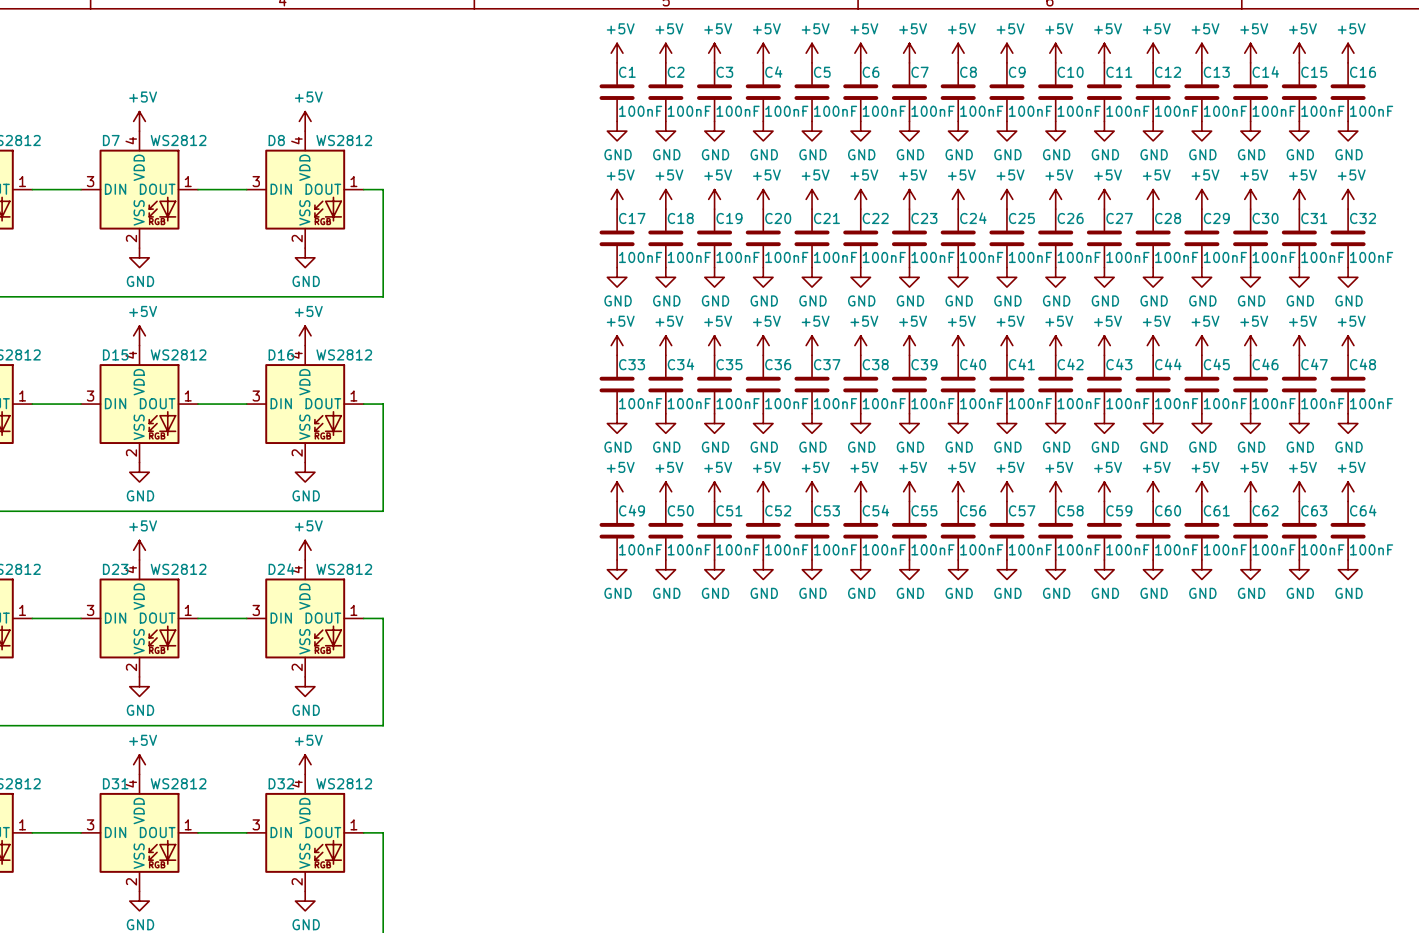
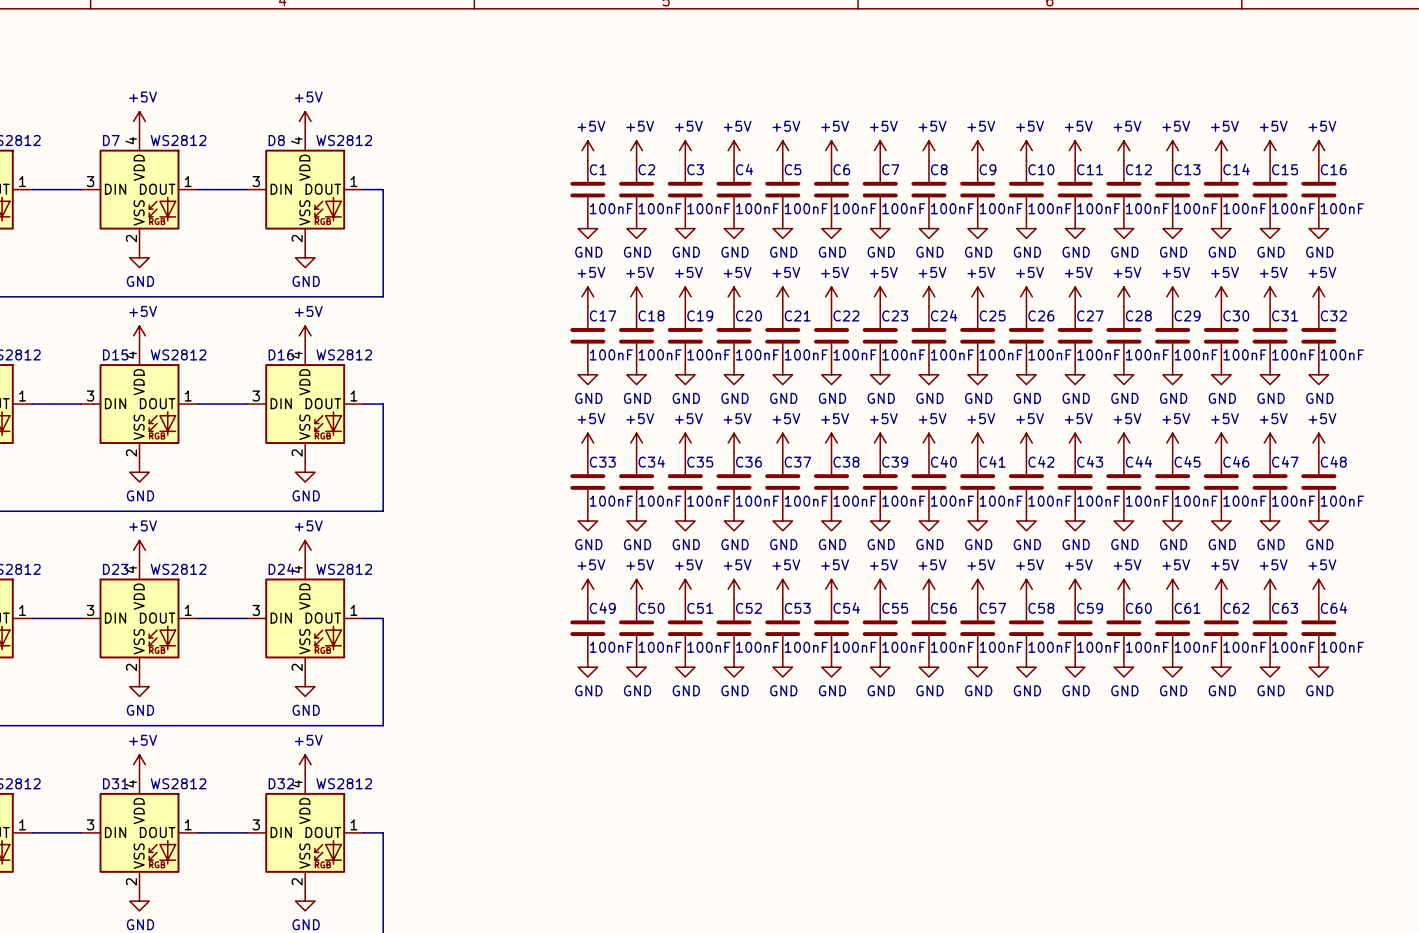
power symbol: +5V (617, 53) -> none
power symbol: +5V (665, 53) -> none
power symbol: +5V (714, 53) -> none
power symbol: +5V (763, 53) -> none
power symbol: +5V (812, 53) -> none
power symbol: +5V (860, 53) -> none
power symbol: +5V (909, 53) -> none
power symbol: +5V (958, 53) -> none
power symbol: +5V (1006, 53) -> none
power symbol: +5V (1055, 53) -> none
power symbol: +5V (1104, 53) -> none
power symbol: +5V (1153, 53) -> none
power symbol: +5V (1201, 53) -> none
power symbol: +5V (1250, 53) -> none
power symbol: +5V (1299, 53) -> none
power symbol: +5V (1348, 53) -> none
C1 position: (617, 92) -> (587, 189)
C2 position: (665, 92) -> (636, 189)
C3 position: (714, 92) -> (685, 189)
C4 position: (763, 92) -> (734, 189)
C5 position: (812, 92) -> (782, 189)
C6 position: (860, 92) -> (831, 189)
C7 position: (909, 92) -> (880, 189)
C8 position: (958, 92) -> (928, 189)
C9 position: (1006, 92) -> (977, 189)
C10 position: (1055, 92) -> (1026, 189)
C11 position: (1104, 92) -> (1075, 189)
C12 position: (1153, 92) -> (1123, 189)
C13 position: (1201, 92) -> (1172, 189)
C14 position: (1250, 92) -> (1221, 189)
C15 position: (1299, 92) -> (1270, 189)
C16 position: (1348, 92) -> (1318, 189)
power symbol: GND (617, 131) -> none
power symbol: GND (665, 131) -> none
power symbol: GND (714, 131) -> none
power symbol: GND (763, 131) -> none
power symbol: GND (812, 131) -> none
power symbol: GND (860, 131) -> none
power symbol: GND (909, 131) -> none
power symbol: GND (958, 131) -> none
power symbol: GND (1006, 131) -> none
power symbol: GND (1055, 131) -> none
power symbol: GND (1104, 131) -> none
power symbol: GND (1153, 131) -> none
power symbol: GND (1201, 131) -> none
power symbol: GND (1250, 131) -> none
power symbol: GND (1299, 131) -> none
power symbol: GND (1348, 131) -> none
power symbol: none -> +5V (587, 150)
power symbol: none -> +5V (636, 150)
power symbol: none -> +5V (685, 150)
power symbol: none -> +5V (734, 150)
power symbol: none -> +5V (782, 150)
power symbol: none -> +5V (831, 150)
power symbol: none -> +5V (880, 150)
power symbol: none -> +5V (928, 150)
power symbol: none -> +5V (977, 150)
power symbol: none -> +5V (1026, 150)
power symbol: none -> +5V (1075, 150)
power symbol: none -> +5V (1123, 150)
power symbol: none -> +5V (1172, 150)
power symbol: none -> +5V (1221, 150)
power symbol: none -> +5V (1270, 150)
power symbol: none -> +5V (1318, 150)
power symbol: +5V (617, 199) -> none
power symbol: +5V (665, 199) -> none
power symbol: +5V (714, 199) -> none
power symbol: +5V (763, 199) -> none
power symbol: +5V (812, 199) -> none
power symbol: +5V (860, 199) -> none
power symbol: +5V (909, 199) -> none
power symbol: +5V (958, 199) -> none
power symbol: +5V (1006, 199) -> none
power symbol: +5V (1055, 199) -> none
power symbol: +5V (1104, 199) -> none
power symbol: +5V (1153, 199) -> none
power symbol: +5V (1201, 199) -> none
power symbol: +5V (1250, 199) -> none
power symbol: +5V (1299, 199) -> none
power symbol: +5V (1348, 199) -> none
power symbol: none -> GND (587, 228)
power symbol: none -> GND (636, 228)
power symbol: none -> GND (685, 228)
power symbol: none -> GND (734, 228)
power symbol: none -> GND (782, 228)
power symbol: none -> GND (831, 228)
power symbol: none -> GND (880, 228)
power symbol: none -> GND (928, 228)
power symbol: none -> GND (977, 228)
power symbol: none -> GND (1026, 228)
power symbol: none -> GND (1075, 228)
power symbol: none -> GND (1123, 228)
power symbol: none -> GND (1172, 228)
power symbol: none -> GND (1221, 228)
power symbol: none -> GND (1270, 228)
power symbol: none -> GND (1318, 228)
C17 position: (617, 238) -> (587, 335)
C18 position: (665, 238) -> (636, 335)
C19 position: (714, 238) -> (685, 335)
C20 position: (763, 238) -> (734, 335)
C21 position: (812, 238) -> (782, 335)
C22 position: (860, 238) -> (831, 335)
C23 position: (909, 238) -> (880, 335)
C24 position: (958, 238) -> (928, 335)
C25 position: (1006, 238) -> (977, 335)
C26 position: (1055, 238) -> (1026, 335)
C27 position: (1104, 238) -> (1075, 335)
C28 position: (1153, 238) -> (1123, 335)
C29 position: (1201, 238) -> (1172, 335)
C30 position: (1250, 238) -> (1221, 335)
C31 position: (1299, 238) -> (1270, 335)
C32 position: (1348, 238) -> (1318, 335)
power symbol: GND (617, 277) -> none
power symbol: GND (665, 277) -> none
power symbol: GND (714, 277) -> none
power symbol: GND (763, 277) -> none
power symbol: GND (812, 277) -> none
power symbol: GND (860, 277) -> none
power symbol: GND (909, 277) -> none
power symbol: GND (958, 277) -> none
power symbol: GND (1006, 277) -> none
power symbol: GND (1055, 277) -> none
power symbol: GND (1104, 277) -> none
power symbol: GND (1153, 277) -> none
power symbol: GND (1201, 277) -> none
power symbol: GND (1250, 277) -> none
power symbol: GND (1299, 277) -> none
power symbol: GND (1348, 277) -> none
power symbol: none -> +5V (587, 296)
power symbol: none -> +5V (636, 296)
power symbol: none -> +5V (685, 296)
power symbol: none -> +5V (734, 296)
power symbol: none -> +5V (782, 296)
power symbol: none -> +5V (831, 296)
power symbol: none -> +5V (880, 296)
power symbol: none -> +5V (928, 296)
power symbol: none -> +5V (977, 296)
power symbol: none -> +5V (1026, 296)
power symbol: none -> +5V (1075, 296)
power symbol: none -> +5V (1123, 296)
power symbol: none -> +5V (1172, 296)
power symbol: none -> +5V (1221, 296)
power symbol: none -> +5V (1270, 296)
power symbol: none -> +5V (1318, 296)
power symbol: +5V (617, 345) -> none
power symbol: +5V (665, 345) -> none
power symbol: +5V (714, 345) -> none
power symbol: +5V (763, 345) -> none
power symbol: +5V (812, 345) -> none
power symbol: +5V (860, 345) -> none
power symbol: +5V (909, 345) -> none
power symbol: +5V (958, 345) -> none
power symbol: +5V (1006, 345) -> none
power symbol: +5V (1055, 345) -> none
power symbol: +5V (1104, 345) -> none
power symbol: +5V (1153, 345) -> none
power symbol: +5V (1201, 345) -> none
power symbol: +5V (1250, 345) -> none
power symbol: +5V (1299, 345) -> none
power symbol: +5V (1348, 345) -> none
power symbol: none -> GND (587, 374)
power symbol: none -> GND (636, 374)
power symbol: none -> GND (685, 374)
power symbol: none -> GND (734, 374)
power symbol: none -> GND (782, 374)
power symbol: none -> GND (831, 374)
power symbol: none -> GND (880, 374)
power symbol: none -> GND (928, 374)
power symbol: none -> GND (977, 374)
power symbol: none -> GND (1026, 374)
power symbol: none -> GND (1075, 374)
power symbol: none -> GND (1123, 374)
power symbol: none -> GND (1172, 374)
power symbol: none -> GND (1221, 374)
power symbol: none -> GND (1270, 374)
power symbol: none -> GND (1318, 374)
C33 position: (617, 384) -> (587, 482)
C34 position: (665, 384) -> (636, 482)
C35 position: (714, 384) -> (685, 482)
C36 position: (763, 384) -> (734, 482)
C37 position: (812, 384) -> (782, 482)
C38 position: (860, 384) -> (831, 482)
C39 position: (909, 384) -> (880, 482)
C40 position: (958, 384) -> (928, 482)
C41 position: (1006, 384) -> (977, 482)
C42 position: (1055, 384) -> (1026, 482)
C43 position: (1104, 384) -> (1075, 482)
C44 position: (1153, 384) -> (1123, 482)
C45 position: (1201, 384) -> (1172, 482)
C46 position: (1250, 384) -> (1221, 482)
C47 position: (1299, 384) -> (1270, 482)
C48 position: (1348, 384) -> (1318, 482)
power symbol: GND (617, 423) -> none
power symbol: GND (665, 423) -> none
power symbol: GND (714, 423) -> none
power symbol: GND (763, 423) -> none
power symbol: GND (812, 423) -> none
power symbol: GND (860, 423) -> none
power symbol: GND (909, 423) -> none
power symbol: GND (958, 423) -> none
power symbol: GND (1006, 423) -> none
power symbol: GND (1055, 423) -> none
power symbol: GND (1104, 423) -> none
power symbol: GND (1153, 423) -> none
power symbol: GND (1201, 423) -> none
power symbol: GND (1250, 423) -> none
power symbol: GND (1299, 423) -> none
power symbol: GND (1348, 423) -> none
power symbol: none -> +5V (587, 443)
power symbol: none -> +5V (636, 443)
power symbol: none -> +5V (685, 443)
power symbol: none -> +5V (734, 443)
power symbol: none -> +5V (782, 443)
power symbol: none -> +5V (831, 443)
power symbol: none -> +5V (880, 443)
power symbol: none -> +5V (928, 443)
power symbol: none -> +5V (977, 443)
power symbol: none -> +5V (1026, 443)
power symbol: none -> +5V (1075, 443)
power symbol: none -> +5V (1123, 443)
power symbol: none -> +5V (1172, 443)
power symbol: none -> +5V (1221, 443)
power symbol: none -> +5V (1270, 443)
power symbol: none -> +5V (1318, 443)
power symbol: +5V (617, 491) -> none
power symbol: +5V (665, 491) -> none
power symbol: +5V (714, 491) -> none
power symbol: +5V (763, 491) -> none
power symbol: +5V (812, 491) -> none
power symbol: +5V (860, 491) -> none
power symbol: +5V (909, 491) -> none
power symbol: +5V (958, 491) -> none
power symbol: +5V (1006, 491) -> none
power symbol: +5V (1055, 491) -> none
power symbol: +5V (1104, 491) -> none
power symbol: +5V (1153, 491) -> none
power symbol: +5V (1201, 491) -> none
power symbol: +5V (1250, 491) -> none
power symbol: +5V (1299, 491) -> none
power symbol: +5V (1348, 491) -> none
power symbol: none -> GND (587, 520)
power symbol: none -> GND (636, 520)
power symbol: none -> GND (685, 520)
power symbol: none -> GND (734, 520)
power symbol: none -> GND (782, 520)
power symbol: none -> GND (831, 520)
power symbol: none -> GND (880, 520)
power symbol: none -> GND (928, 520)
power symbol: none -> GND (977, 520)
power symbol: none -> GND (1026, 520)
power symbol: none -> GND (1075, 520)
power symbol: none -> GND (1123, 520)
power symbol: none -> GND (1172, 520)
power symbol: none -> GND (1221, 520)
power symbol: none -> GND (1270, 520)
power symbol: none -> GND (1318, 520)
C49 position: (617, 530) -> (587, 628)
C50 position: (665, 530) -> (636, 628)
C51 position: (714, 530) -> (685, 628)
C52 position: (763, 530) -> (734, 628)
C53 position: (812, 530) -> (782, 628)
C54 position: (860, 530) -> (831, 628)
C55 position: (909, 530) -> (880, 628)
C56 position: (958, 530) -> (928, 628)
C57 position: (1006, 530) -> (977, 628)
C58 position: (1055, 530) -> (1026, 628)
C59 position: (1104, 530) -> (1075, 628)
C60 position: (1153, 530) -> (1123, 628)
C61 position: (1201, 530) -> (1172, 628)
C62 position: (1250, 530) -> (1221, 628)
C63 position: (1299, 530) -> (1270, 628)
C64 position: (1348, 530) -> (1318, 628)
power symbol: GND (617, 569) -> none
power symbol: GND (665, 569) -> none
power symbol: GND (714, 569) -> none
power symbol: GND (763, 569) -> none
power symbol: GND (812, 569) -> none
power symbol: GND (860, 569) -> none
power symbol: GND (909, 569) -> none
power symbol: GND (958, 569) -> none
power symbol: GND (1006, 569) -> none
power symbol: GND (1055, 569) -> none
power symbol: GND (1104, 569) -> none
power symbol: GND (1153, 569) -> none
power symbol: GND (1201, 569) -> none
power symbol: GND (1250, 569) -> none
power symbol: GND (1299, 569) -> none
power symbol: GND (1348, 569) -> none
power symbol: none -> +5V (587, 589)
power symbol: none -> +5V (636, 589)
power symbol: none -> +5V (685, 589)
power symbol: none -> +5V (734, 589)
power symbol: none -> +5V (782, 589)
power symbol: none -> +5V (831, 589)
power symbol: none -> +5V (880, 589)
power symbol: none -> +5V (928, 589)
power symbol: none -> +5V (977, 589)
power symbol: none -> +5V (1026, 589)
power symbol: none -> +5V (1075, 589)
power symbol: none -> +5V (1123, 589)
power symbol: none -> +5V (1172, 589)
power symbol: none -> +5V (1221, 589)
power symbol: none -> +5V (1270, 589)
power symbol: none -> +5V (1318, 589)
power symbol: none -> GND (587, 667)
power symbol: none -> GND (636, 667)
power symbol: none -> GND (685, 667)
power symbol: none -> GND (734, 667)
power symbol: none -> GND (782, 667)
power symbol: none -> GND (831, 667)
power symbol: none -> GND (880, 667)
power symbol: none -> GND (928, 667)
power symbol: none -> GND (977, 667)
power symbol: none -> GND (1026, 667)
power symbol: none -> GND (1075, 667)
power symbol: none -> GND (1123, 667)
power symbol: none -> GND (1172, 667)
power symbol: none -> GND (1221, 667)
power symbol: none -> GND (1270, 667)
power symbol: none -> GND (1318, 667)

